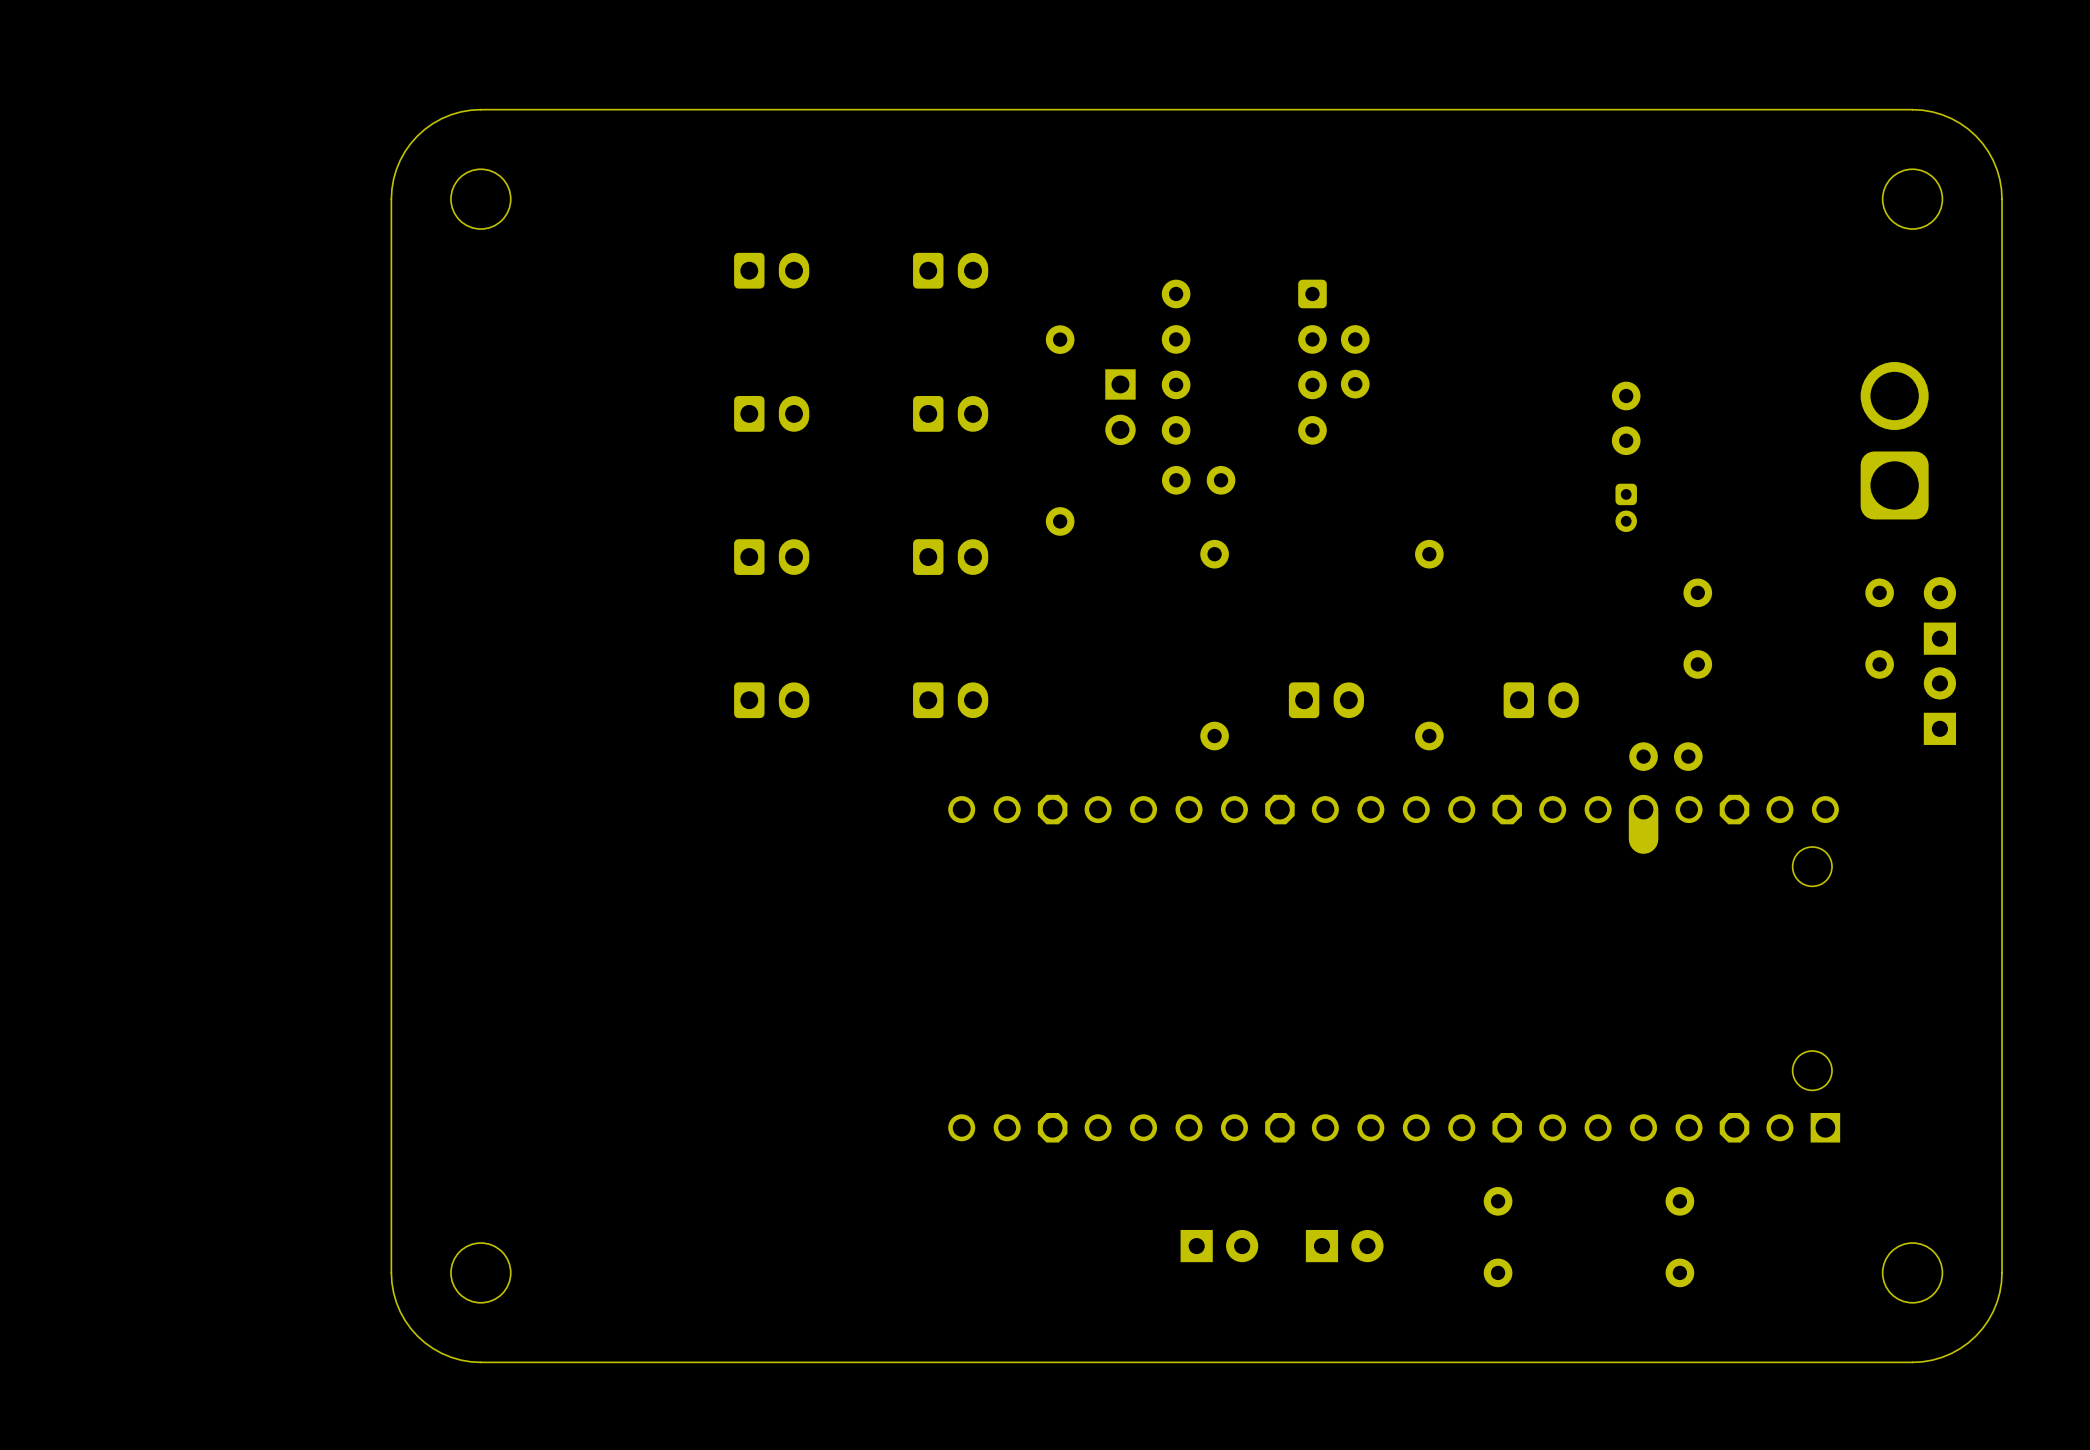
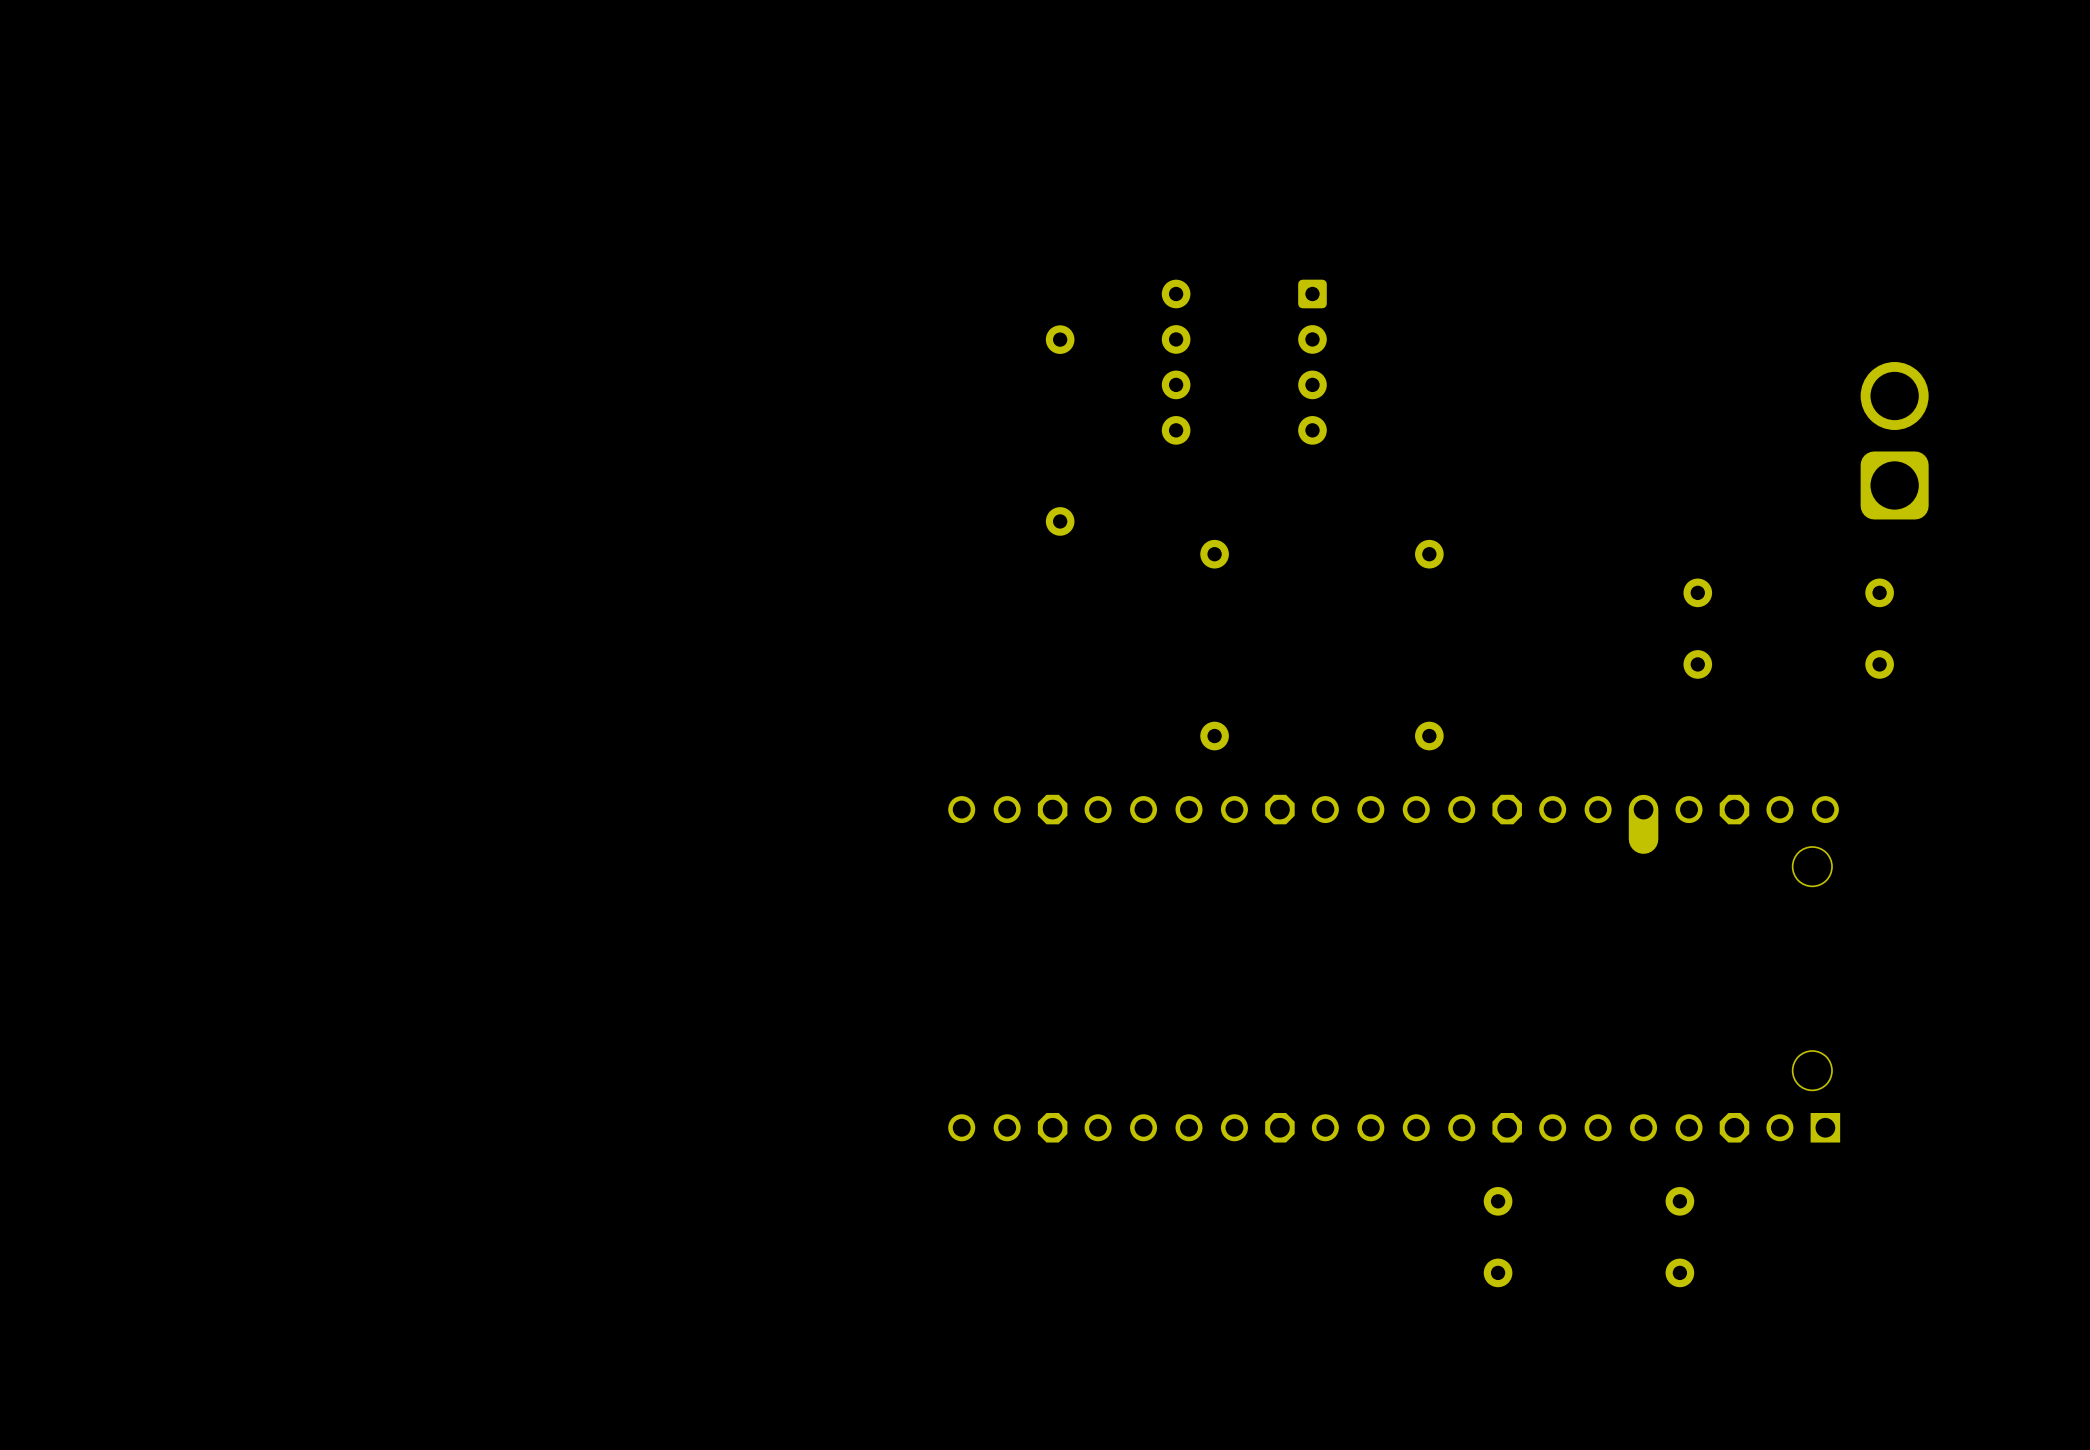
board edge: (1912, 109) (480, 109) (451, 114) (425, 129) (410, 143) (400, 160) (393, 179) (391, 199) (391, 1272) (396, 1302) (410, 1328) (425, 1342) (442, 1353) (460, 1360) (480, 1362) (1912, 1362) (1942, 1357) (1968, 1342) (1982, 1328) (1993, 1311) (1999, 1292) (2002, 1272) (2002, 199) (1997, 169) (1988, 151) (1975, 135) (1951, 118) (1932, 111) (1912, 109) -> none
round board edge: [450, 168, 512, 230] -> none
round board edge: [1882, 168, 1943, 230] -> none
part: (771, 270) -> none
part: (950, 270) -> none
part: (1355, 361) -> none
part: (1120, 407) -> none
part: (771, 413) -> none
part: (950, 413) -> none
part: (1626, 418) -> none
part: (1198, 480) -> none
part: (1626, 507) -> none
part: (771, 557) -> none
part: (950, 557) -> none
part: (1939, 615) -> none
part: (771, 700) -> none
part: (950, 700) -> none
part: (1326, 700) -> none
part: (1541, 700) -> none
part: (1939, 706) -> none
part: (1665, 756) -> none
round board edge: [450, 1242, 512, 1304] -> none
round board edge: [1882, 1242, 1943, 1304] -> none
part: (1219, 1246) -> none
part: (1344, 1246) -> none

